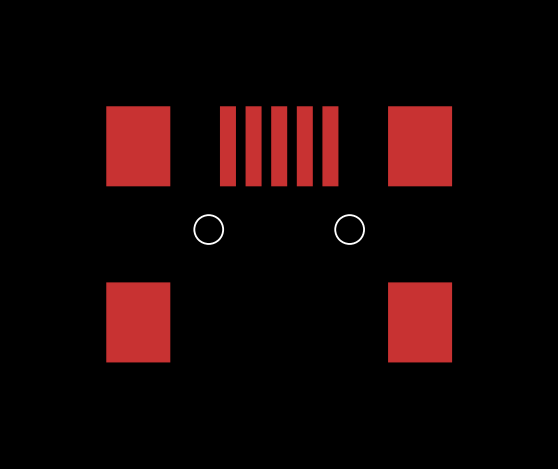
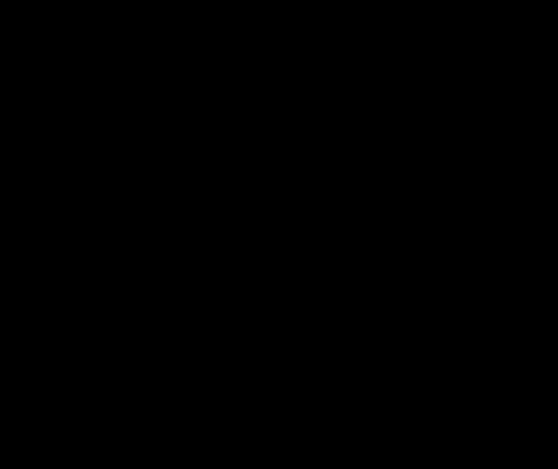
part: (279, 234) -> none

